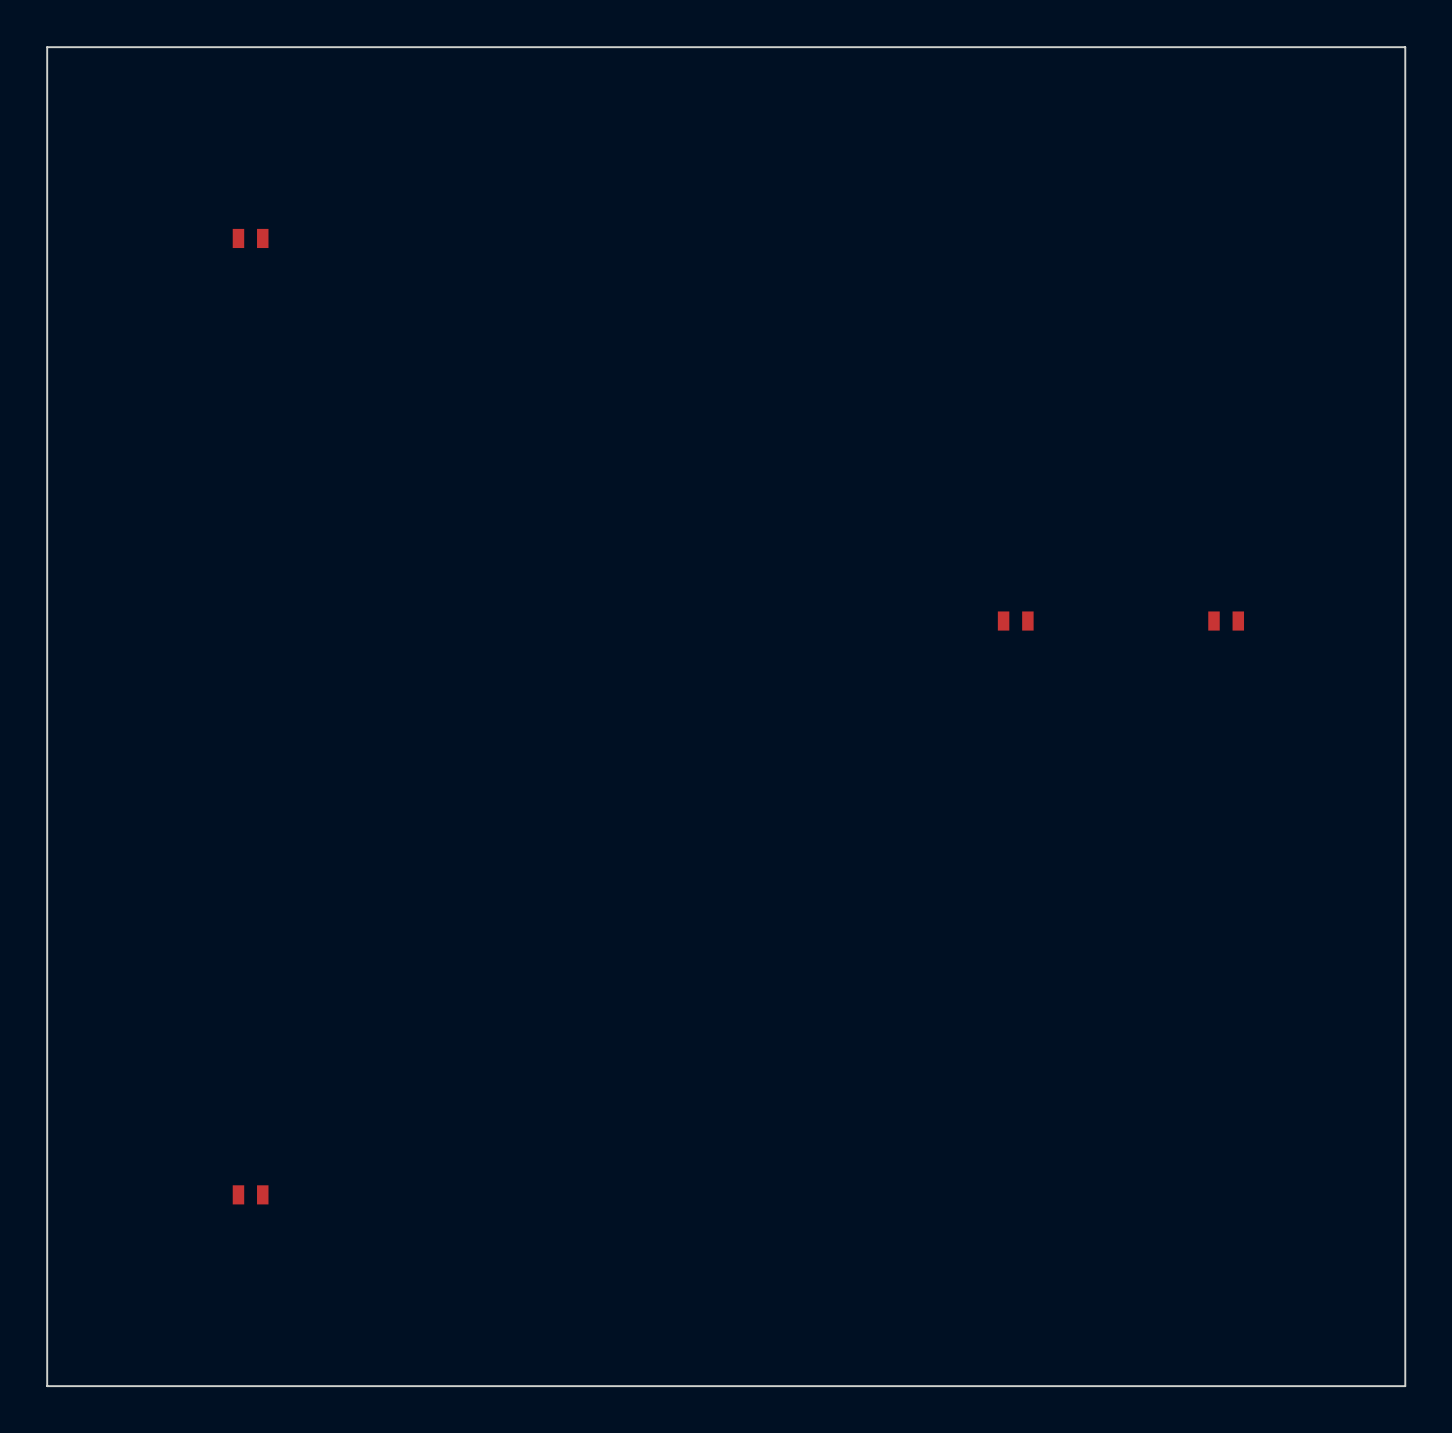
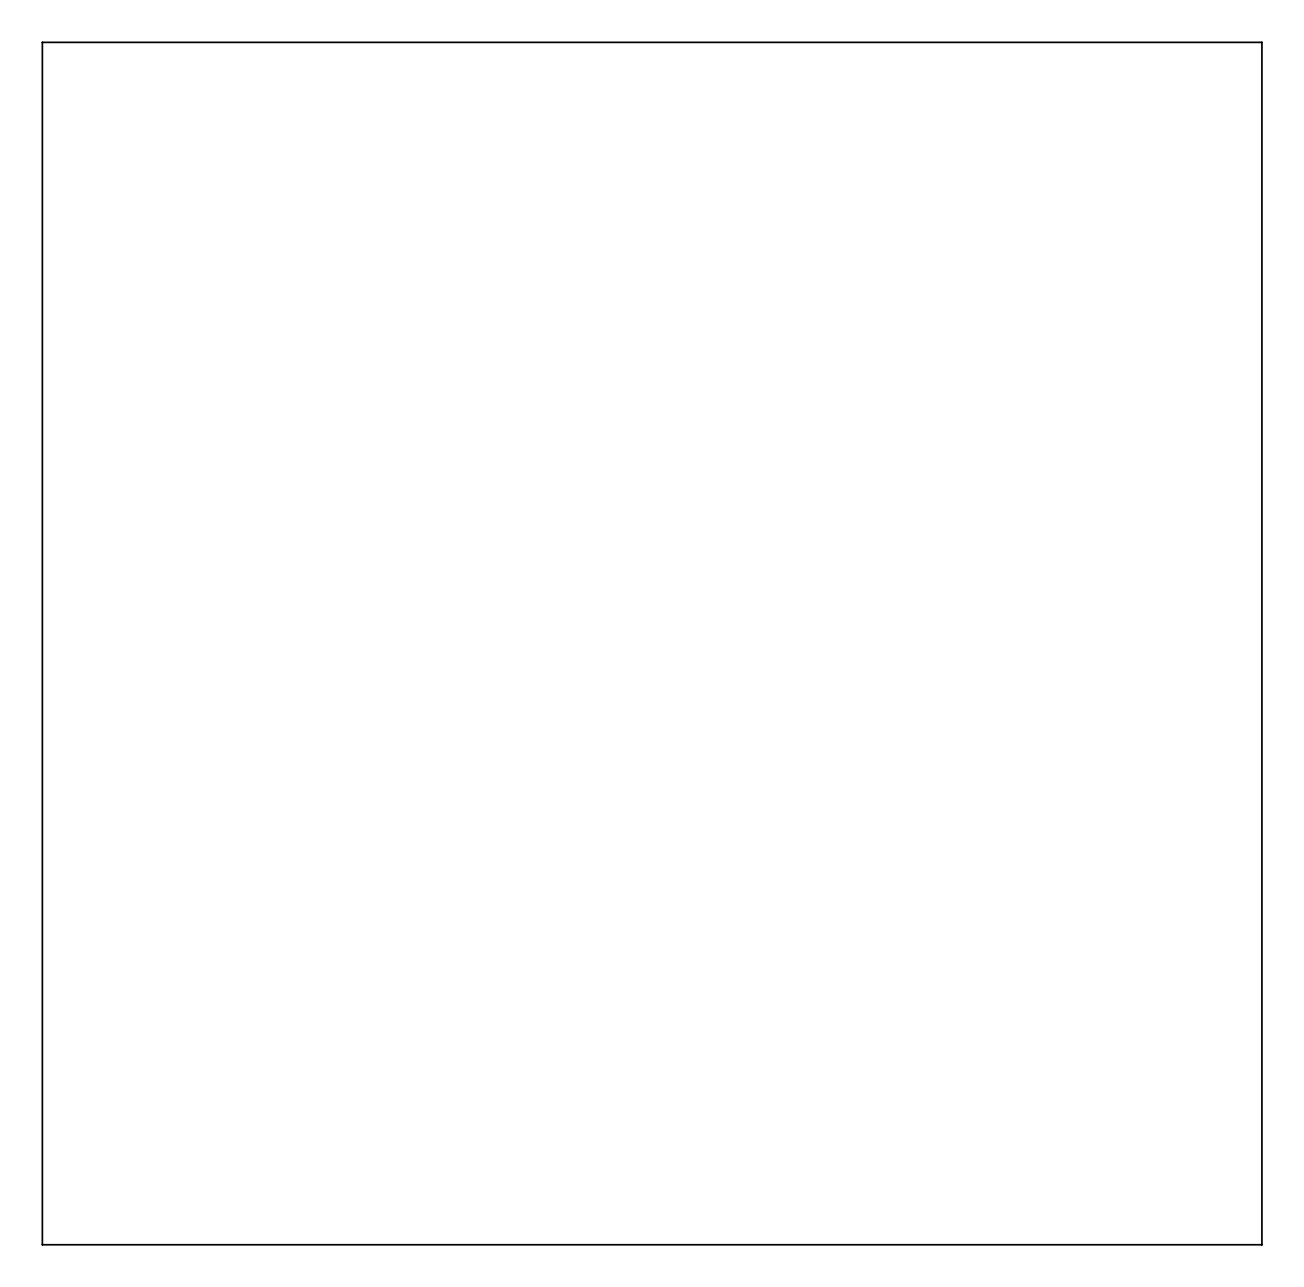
part: (250, 238) -> none
part: (1015, 621) -> none
part: (1226, 621) -> none
part: (250, 1194) -> none

